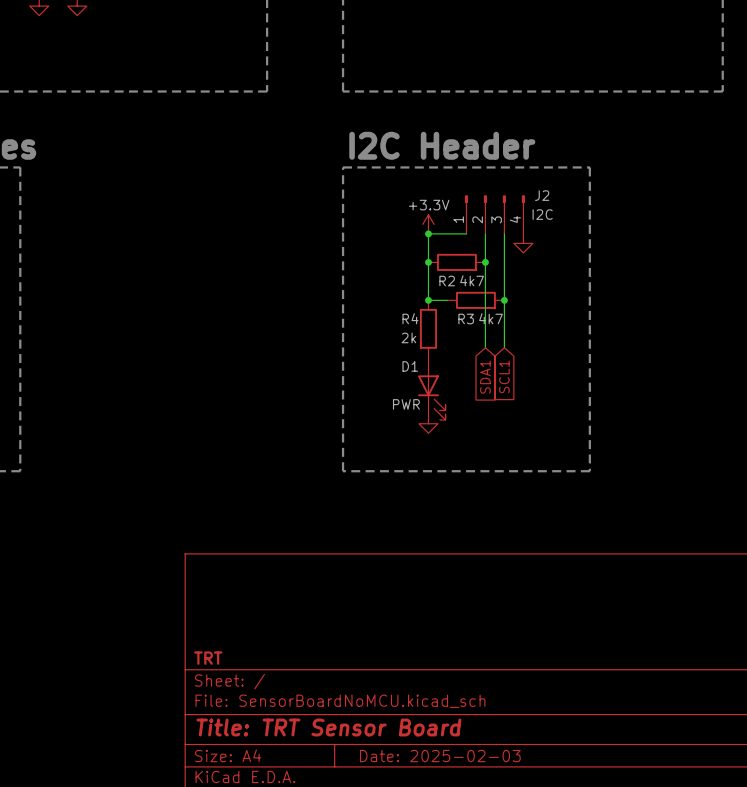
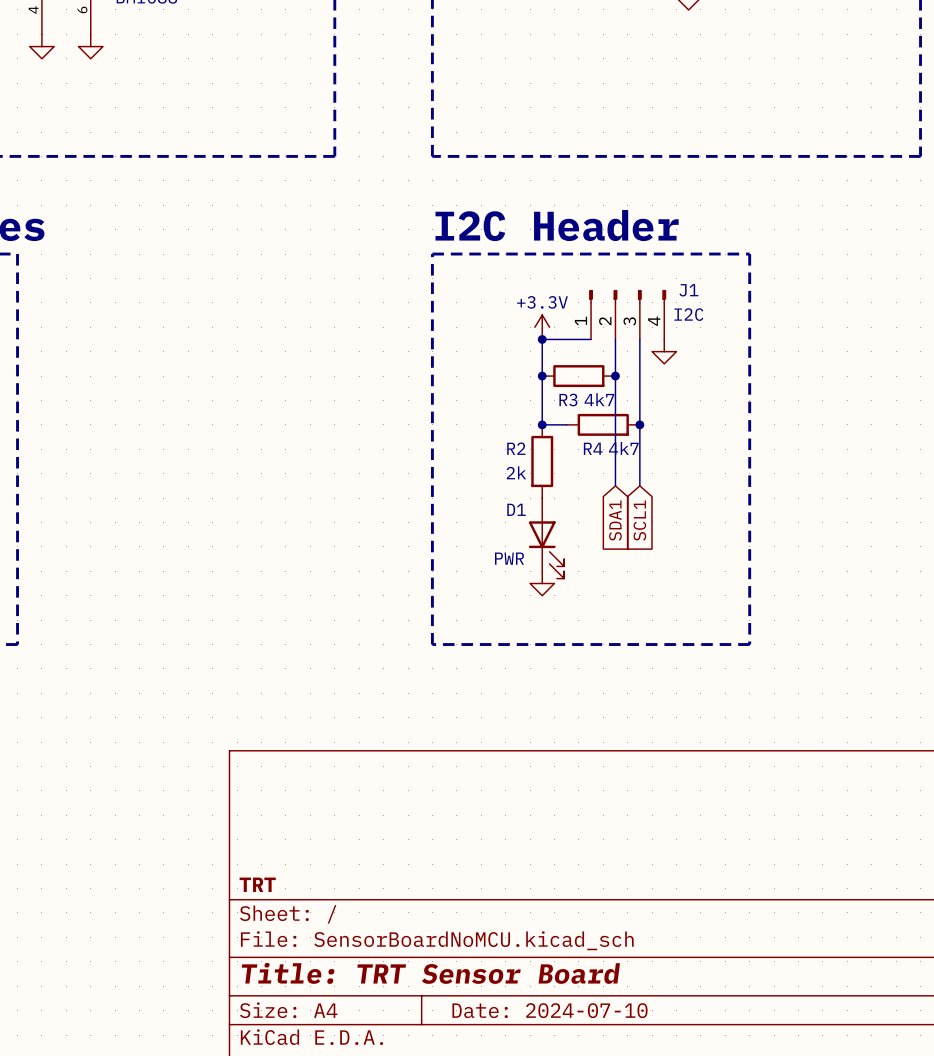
J2 name: J2 (542, 195) -> J1 (688, 290)
R2 name: R2 (447, 281) -> R3 (568, 400)
R4 name: R4 (410, 318) -> R2 (516, 448)
R3 name: R3 (466, 318) -> R4 (593, 448)
title block: Date: 2025-02-03 (440, 756) -> Date: 2024-07-10 (550, 1010)

